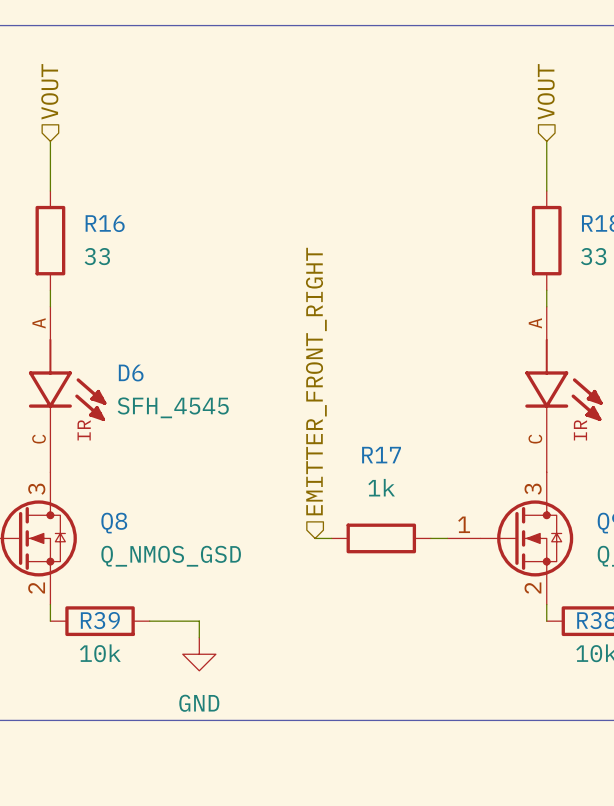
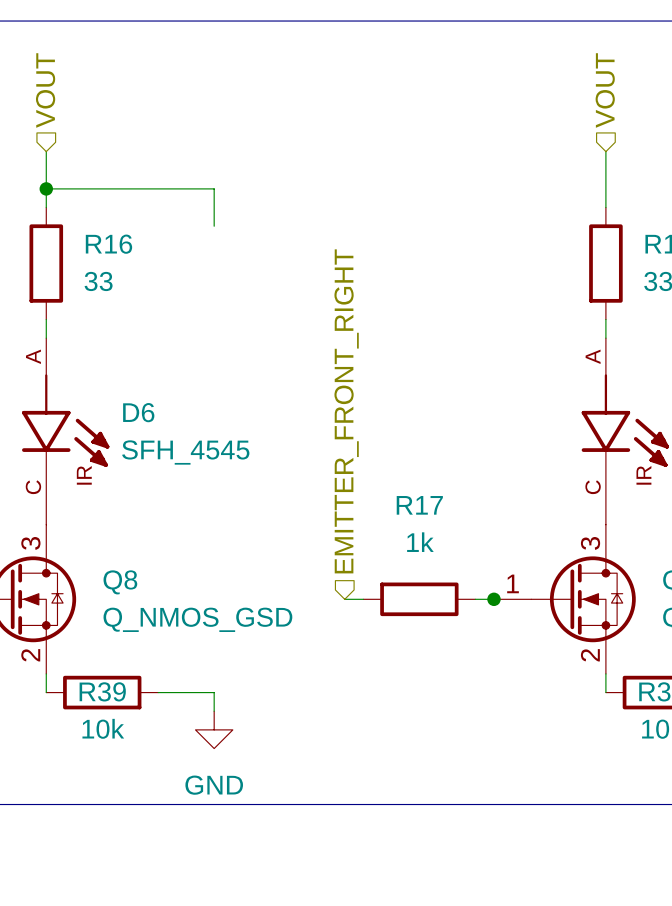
wire: none -> (46, 188) (214, 188) (214, 226)
junction: none -> (46, 188)
junction: none -> (493, 599)

